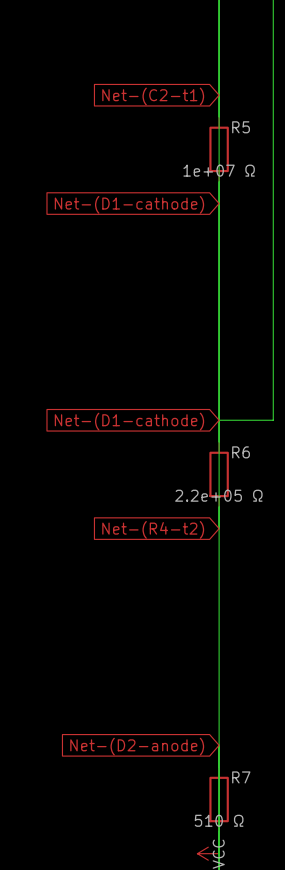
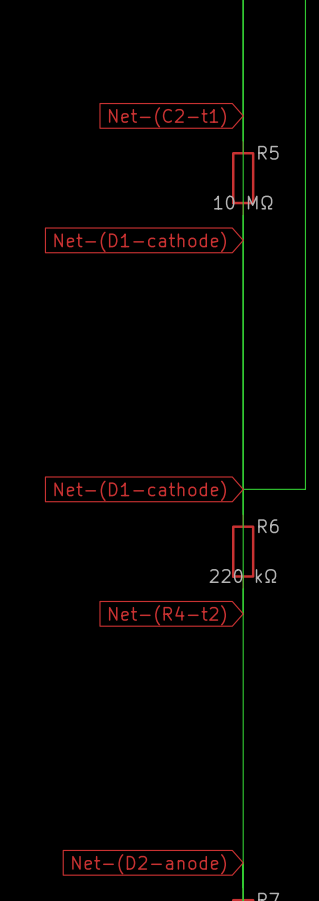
R5 value: 1e+07 Ω (219, 170) -> 10 MΩ (243, 202)
R6 value: 2.2e+05 Ω (218, 495) -> 220 kΩ (242, 576)

